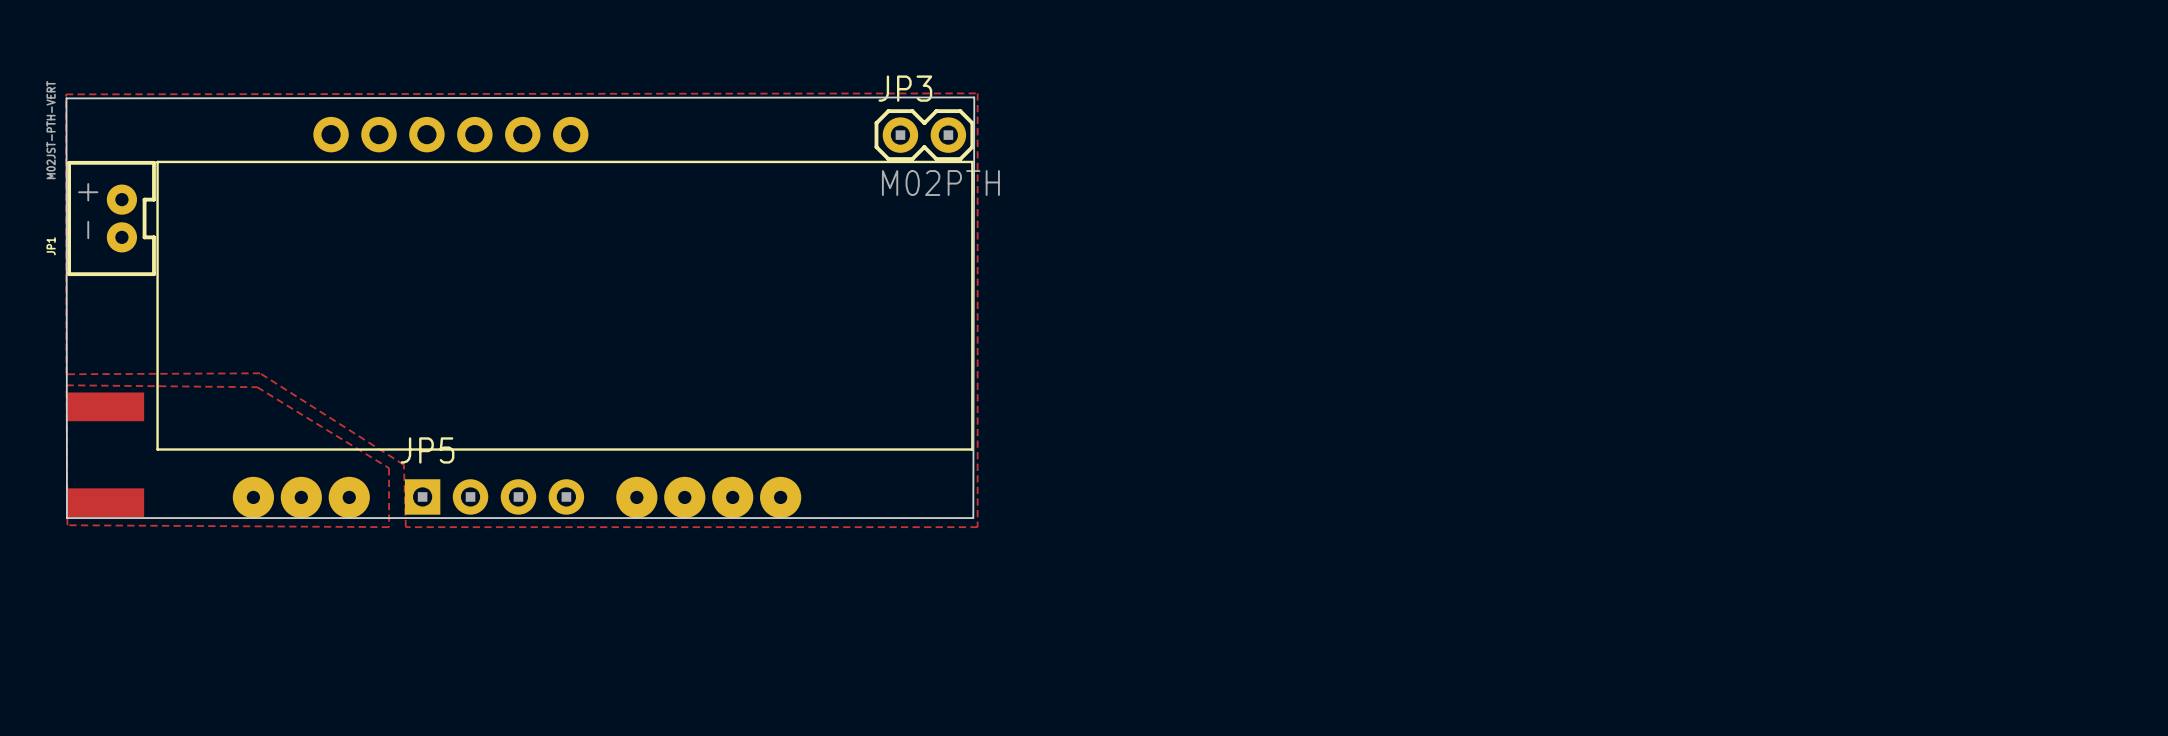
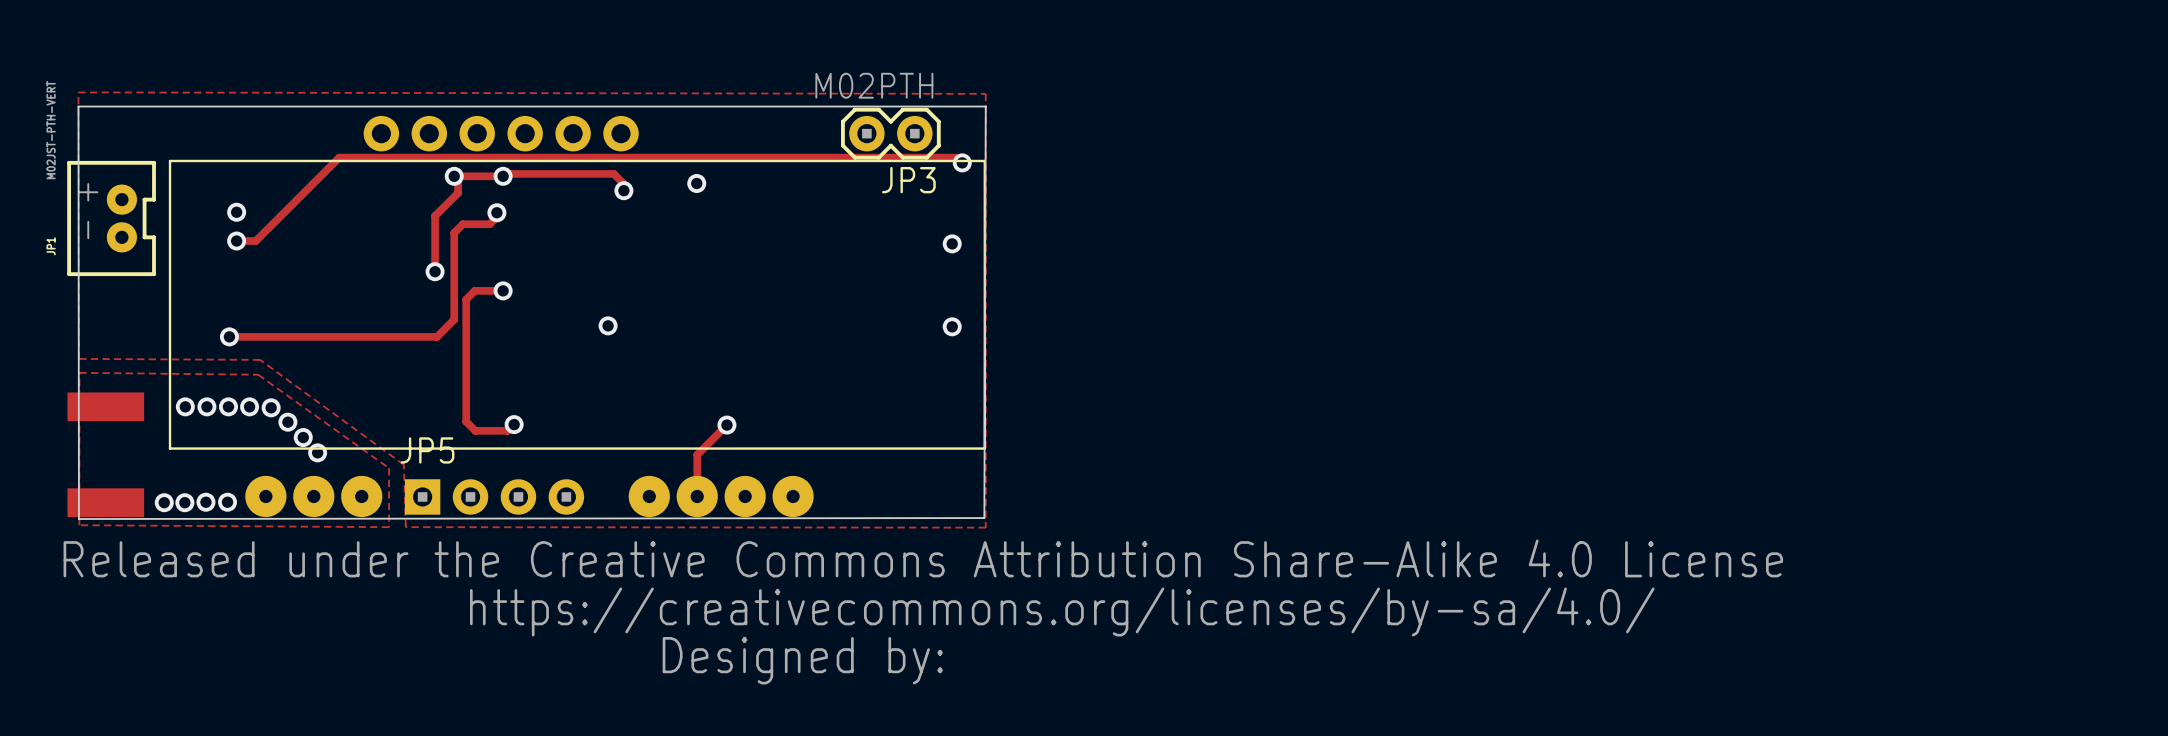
JP3 name position: JP3 (905, 88) -> JP3 (908, 180)
board edge: (974, 97) (973, 518) (66, 518) (66, 98) (974, 97) -> (78, 106) (78, 519) (984, 518) (985, 106) (78, 106)
part position: (450, 134) -> (501, 133)
JP3 position: (924, 135) -> (890, 133)
track: none -> (962, 162) (957, 157) (339, 157) (255, 241) (236, 241)
via: none -> (962, 162)
via: none -> (454, 176)
via: none -> (503, 176)
via: none -> (696, 183)
JP3 value position: M02PTH (940, 183) -> M02PTH (874, 85)
track: none -> (623, 190) (623, 183) (613, 173) (505, 173) (503, 176) (454, 176) (458, 180) (458, 193) (435, 216) (435, 271)
via: none -> (623, 190)
via: none -> (236, 212)
track: none -> (496, 212) (496, 217) (489, 224) (462, 224) (454, 232) (454, 319) (436, 336) (229, 336)
via: none -> (496, 212)
via: none -> (236, 241)
via: none -> (952, 243)
via: none -> (435, 271)
track: none -> (503, 290) (474, 290) (466, 299) (466, 421) (475, 430) (507, 430) (514, 424)
via: none -> (503, 290)
via: none -> (608, 325)
via: none -> (952, 326)
via: none -> (229, 336)
part position: (564, 339) -> (577, 338)
via: none -> (185, 406)
via: none -> (206, 406)
via: none -> (228, 406)
via: none -> (249, 406)
via: none -> (271, 407)
via: none -> (287, 422)
via: none -> (514, 424)
track: none -> (726, 425) (697, 454) (697, 496)
via: none -> (726, 425)
via: none -> (303, 437)
via: none -> (317, 452)
zone outline: (403, 464) (260, 373) (66, 374) (66, 94) (977, 93) (977, 527) (405, 527) -> (403, 464) (260, 359) (78, 358) (78, 92) (985, 93) (985, 527) (405, 527)
zone outline: (389, 468) (257, 387) (66, 385) (67, 525) (389, 527) -> (389, 468) (258, 374) (79, 372) (79, 525) (389, 527)
via: none -> (164, 502)
via: none -> (184, 502)
via: none -> (205, 502)
via: none -> (227, 502)
drawing: none -> [63, 539, 1784, 685]

